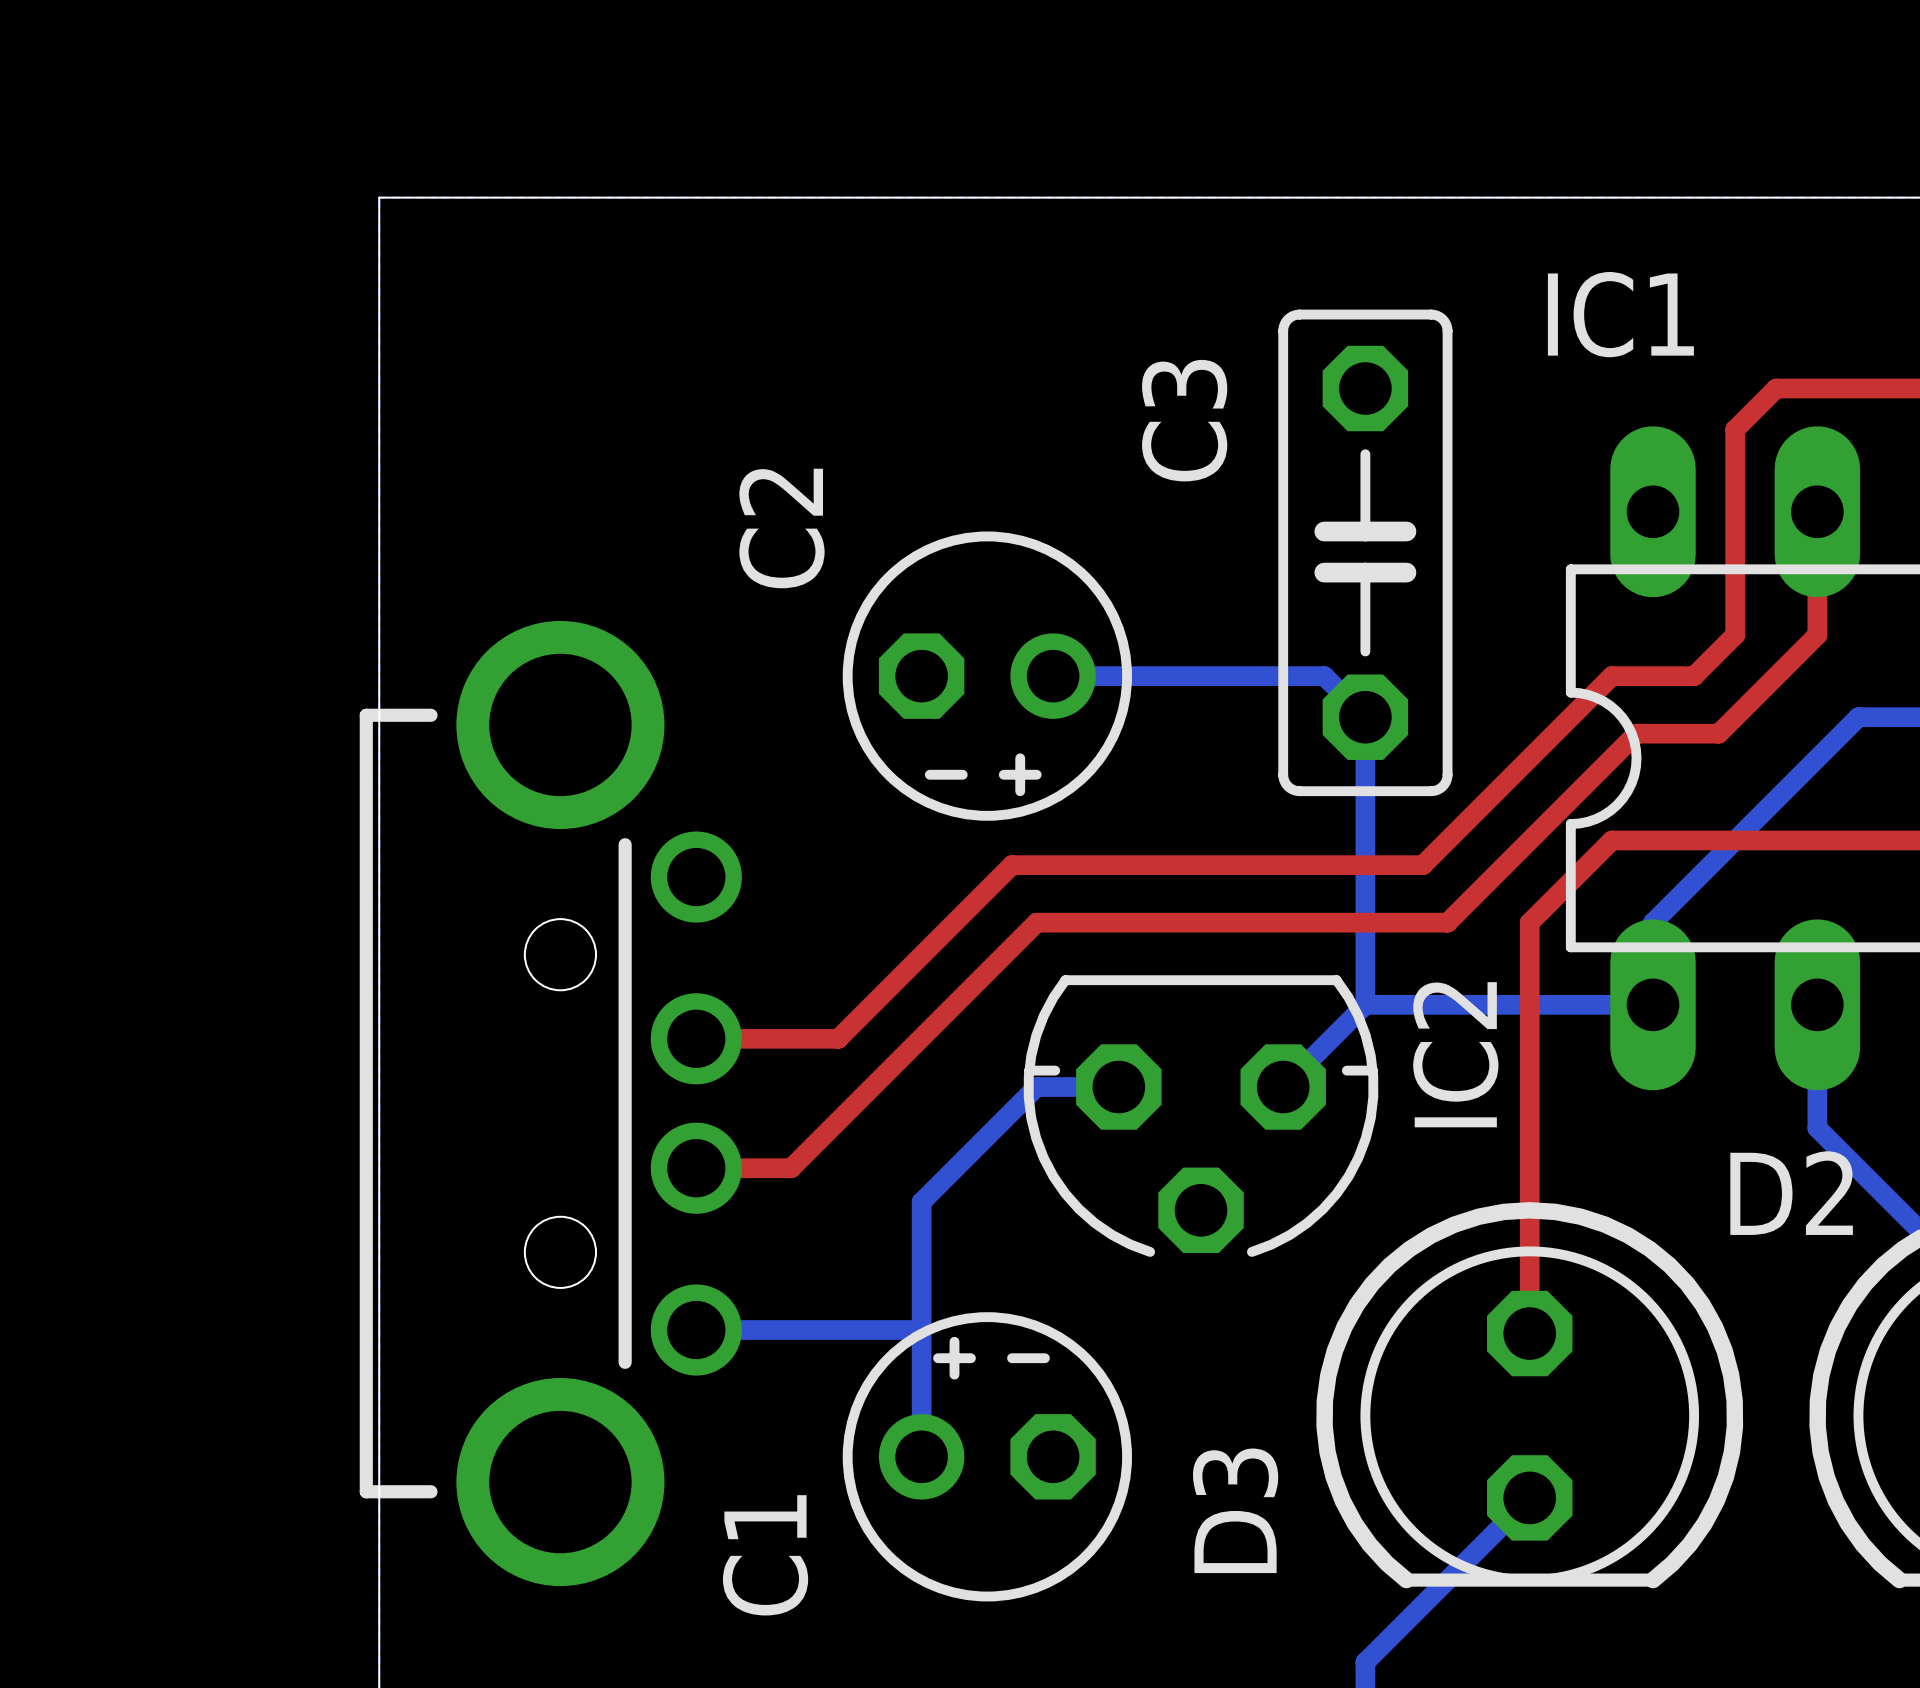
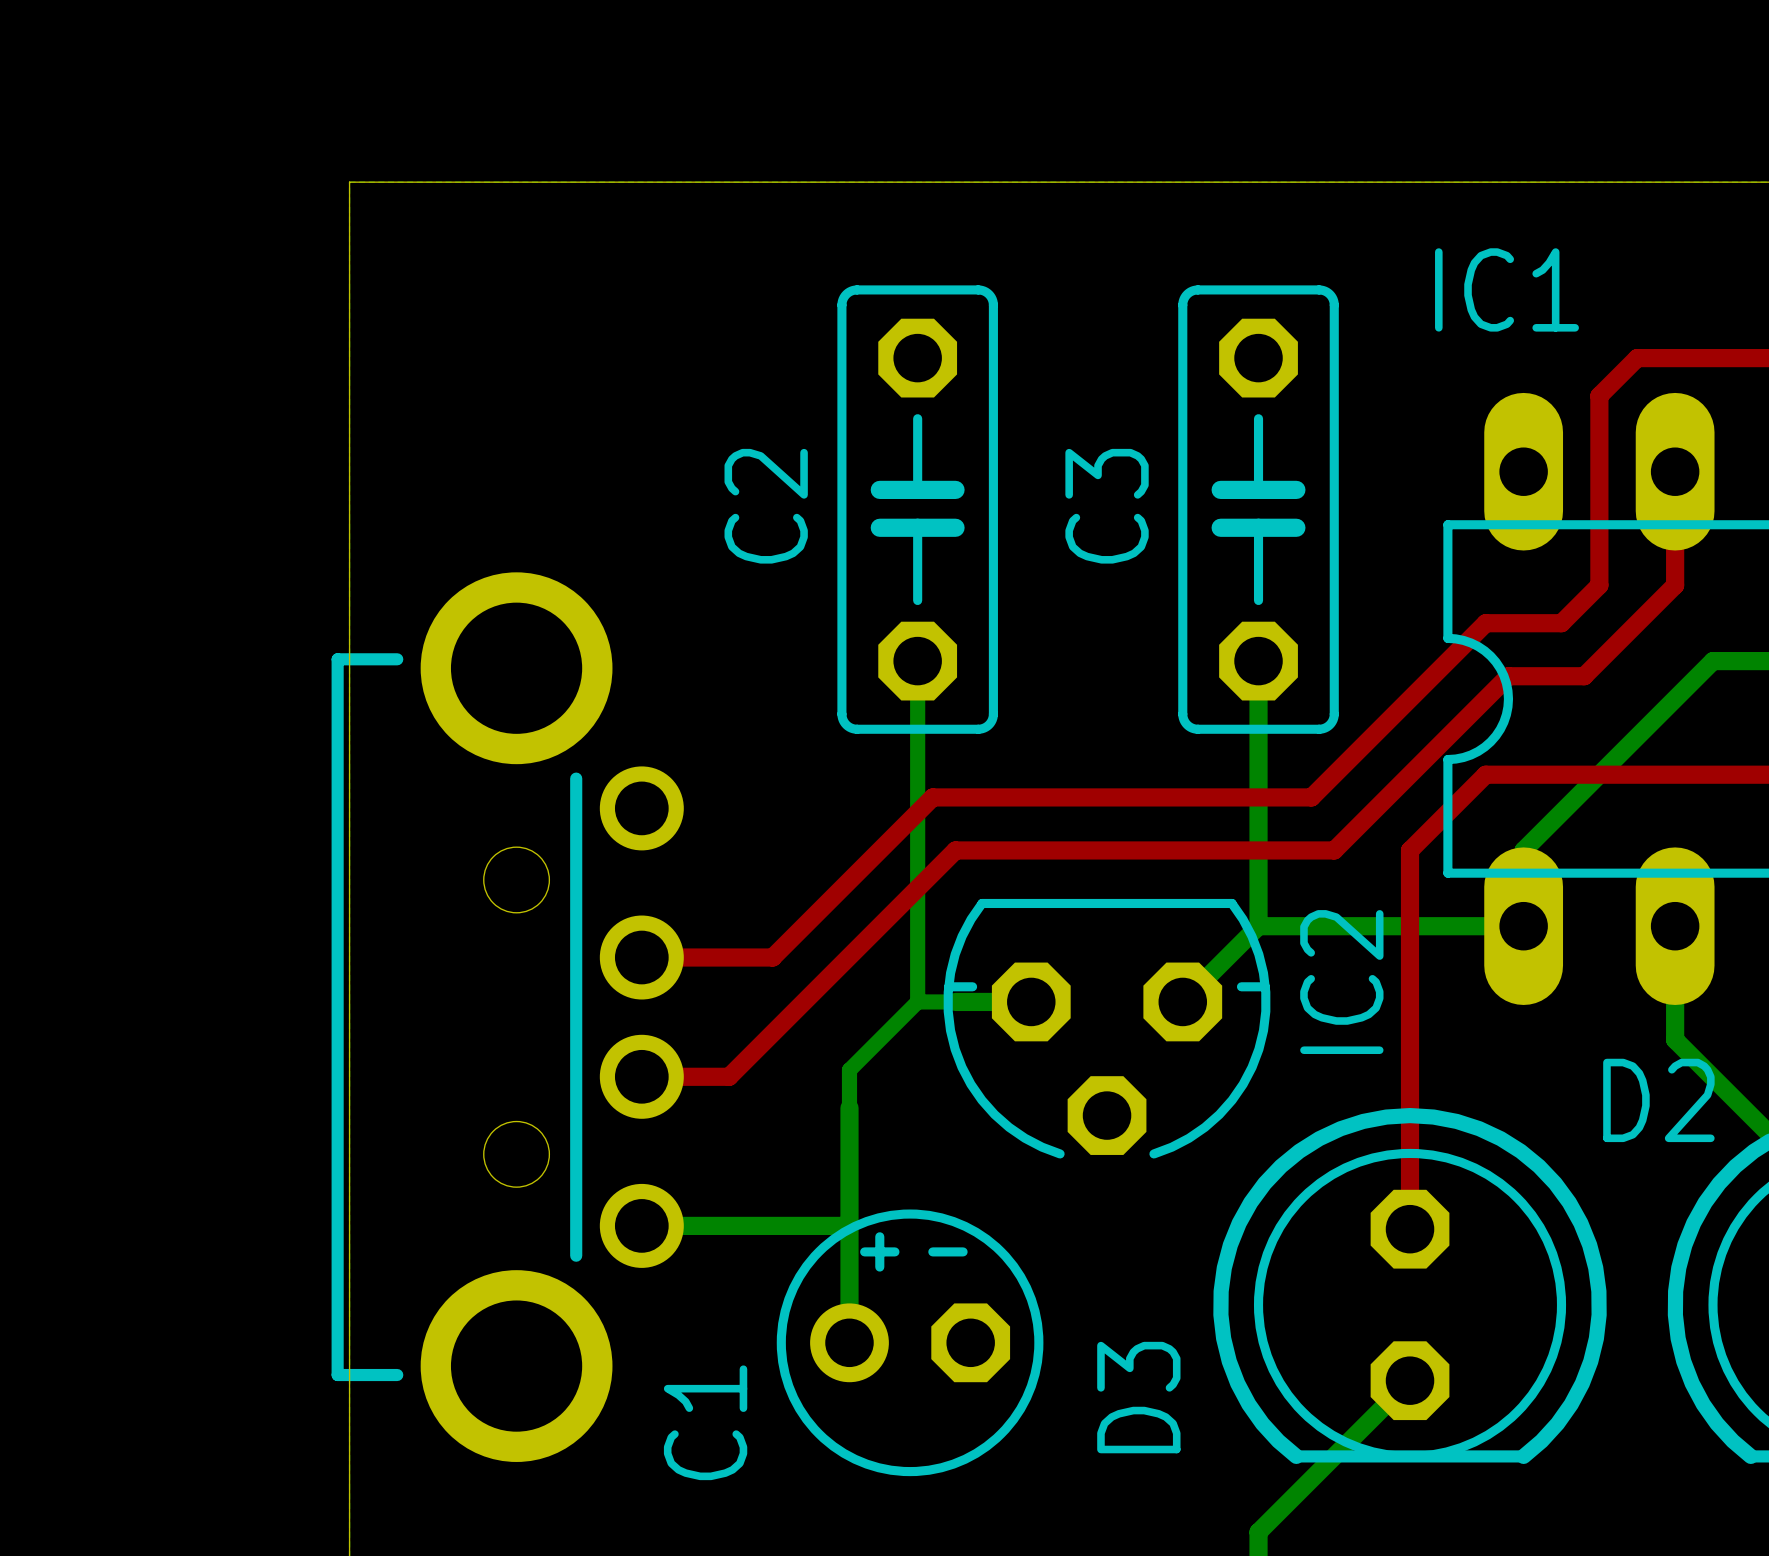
C3 name position: C3 (1184, 420) -> C3 (1107, 506)
C2 name position: C2 (781, 528) -> C2 (766, 506)
C2 footprint: [842, 531, 1133, 821] -> [837, 285, 998, 734]
bottom track: (1053, 676) (1324, 676) (1365, 717) -> none
bottom track: none -> (917, 661) (917, 1001)
bottom track: none -> (917, 1001) (955, 1001)
bottom track: (1036, 1087) (921, 1202) -> (917, 1001) (849, 1070) (849, 1107)

